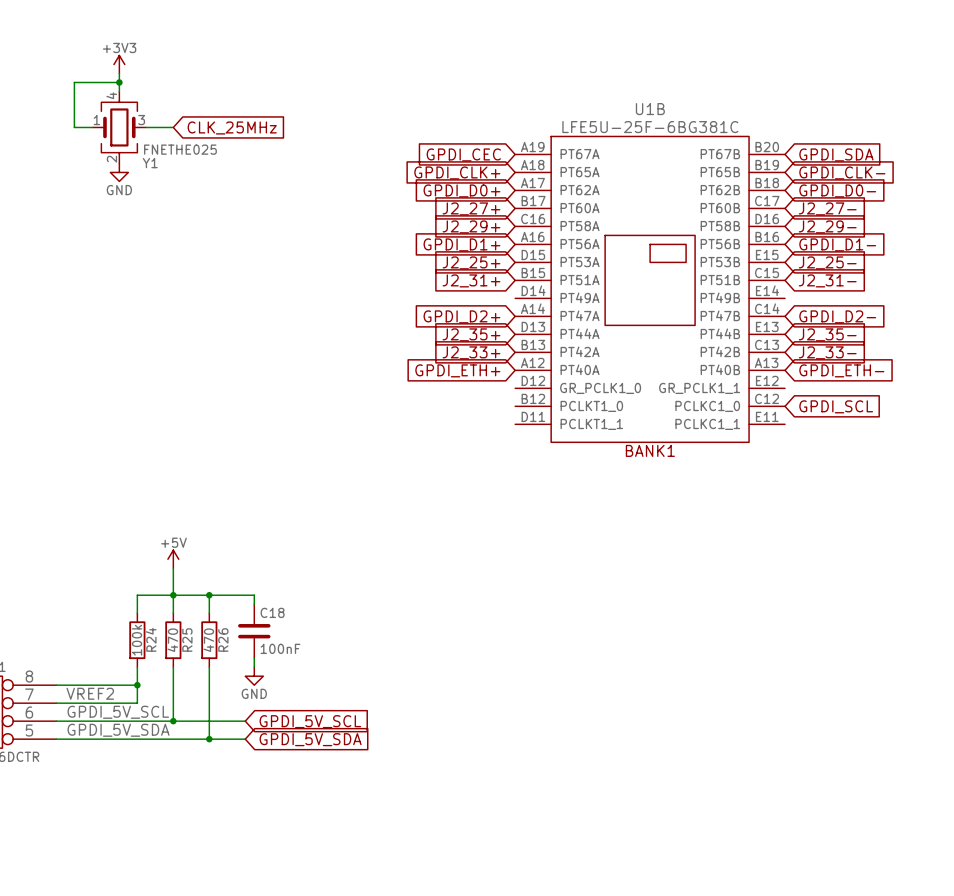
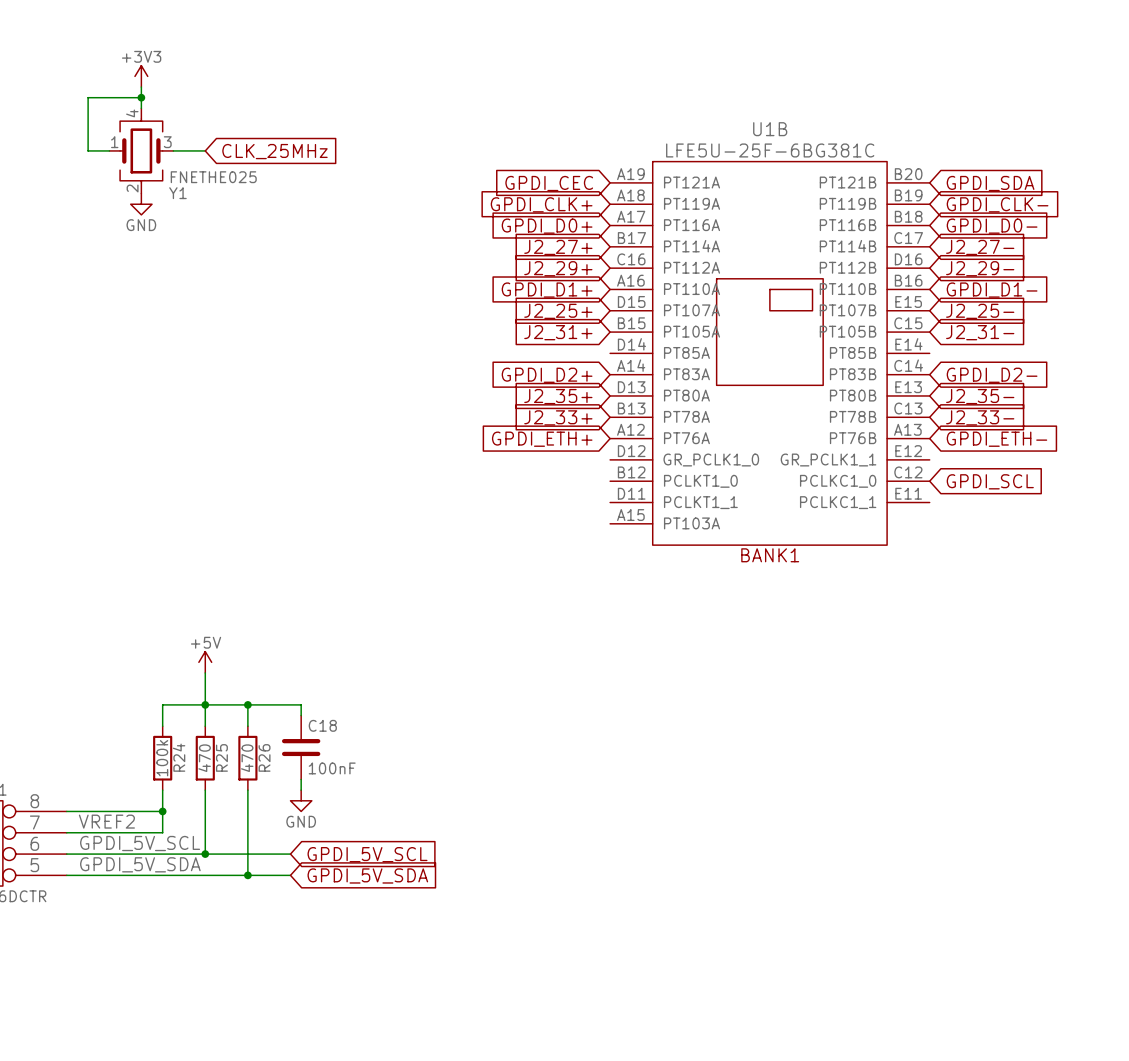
U1B symbol: [515, 136, 786, 443] -> [610, 161, 930, 546]

